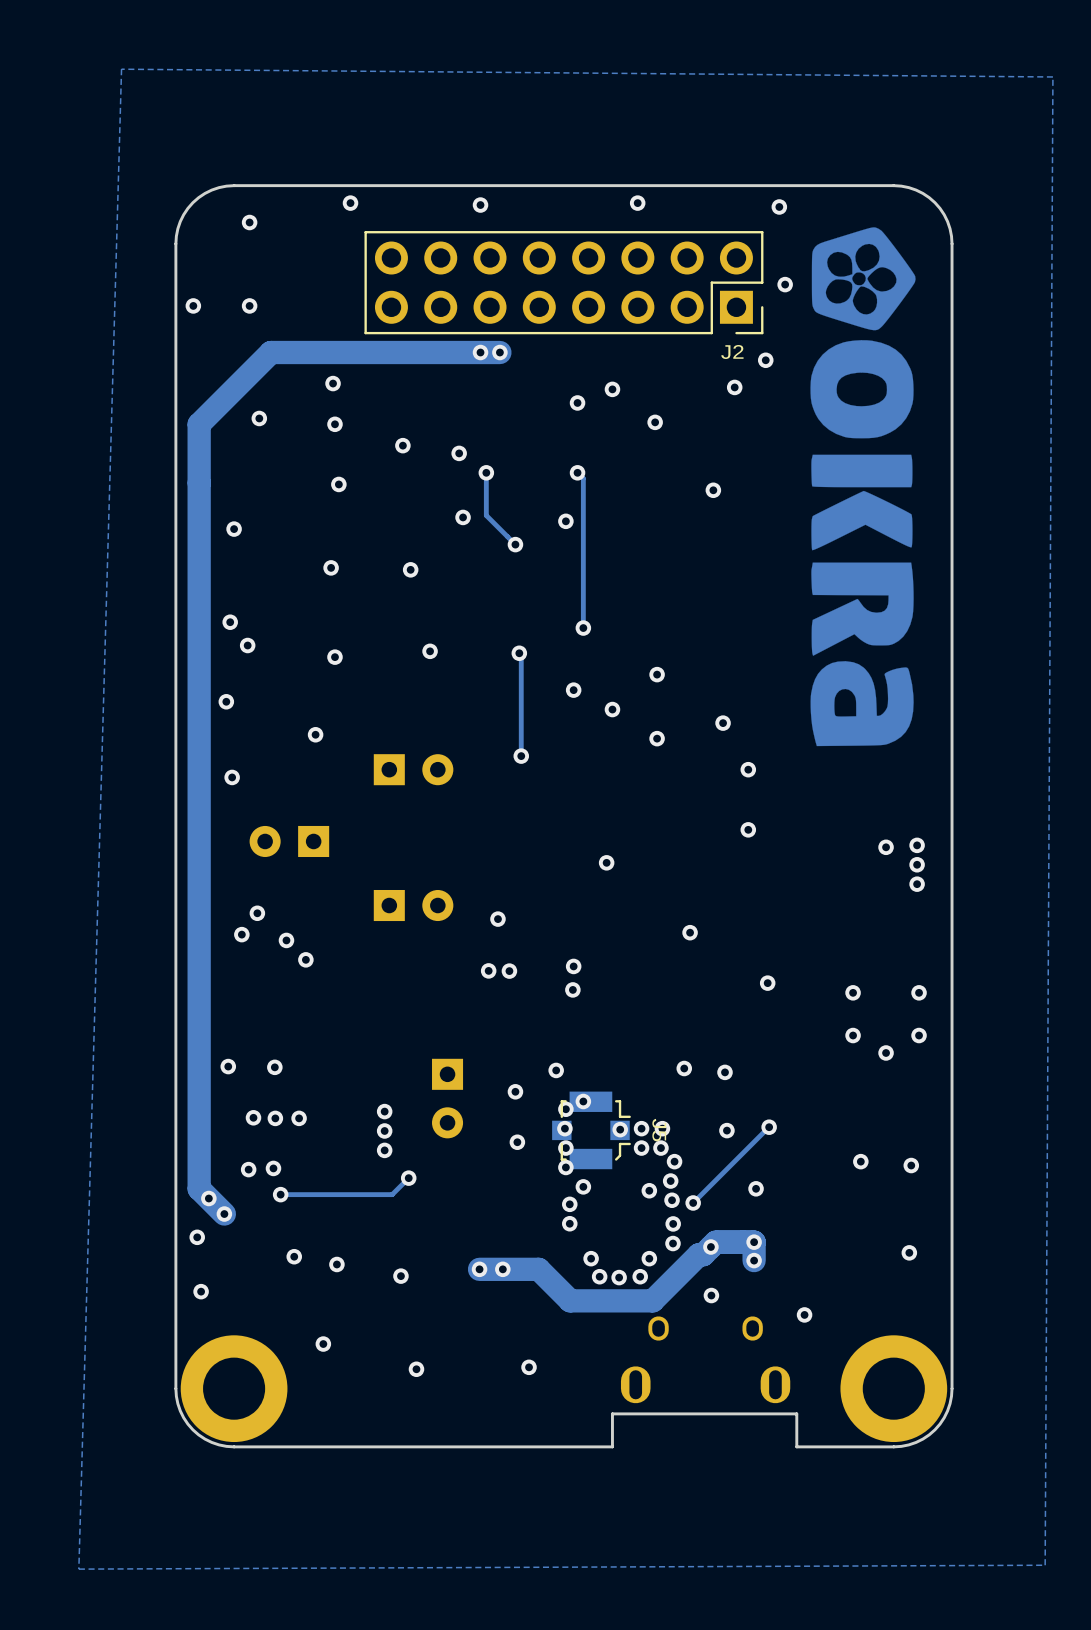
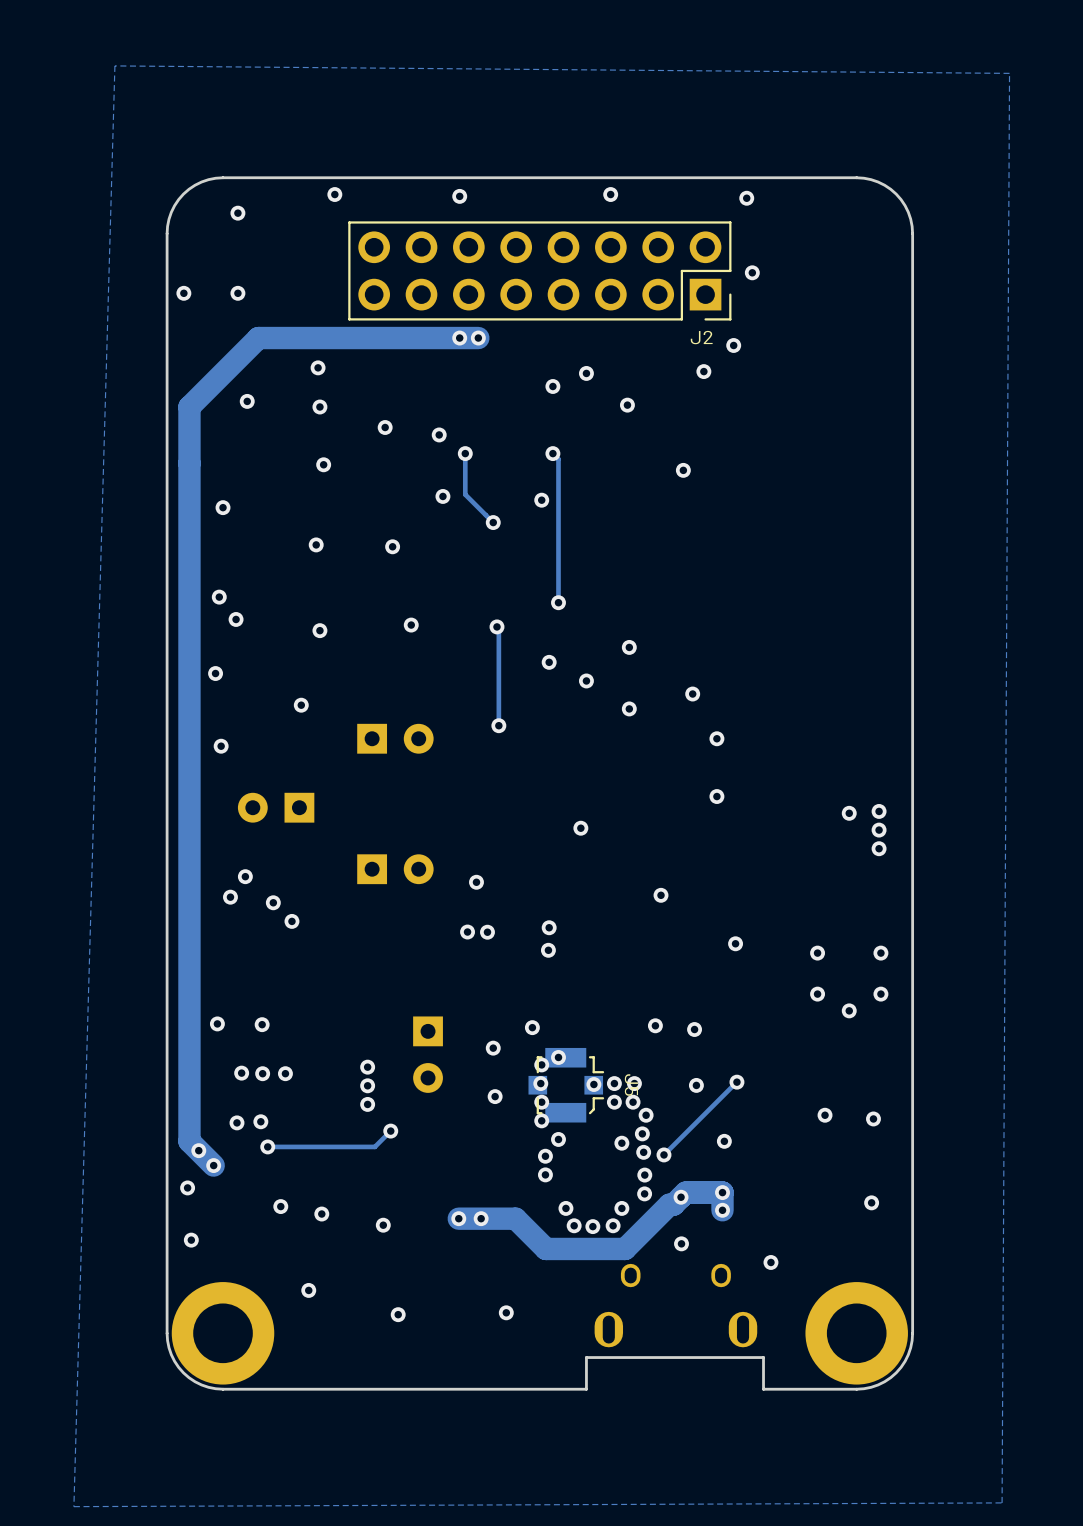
drawing: [810, 227, 916, 747] -> none

